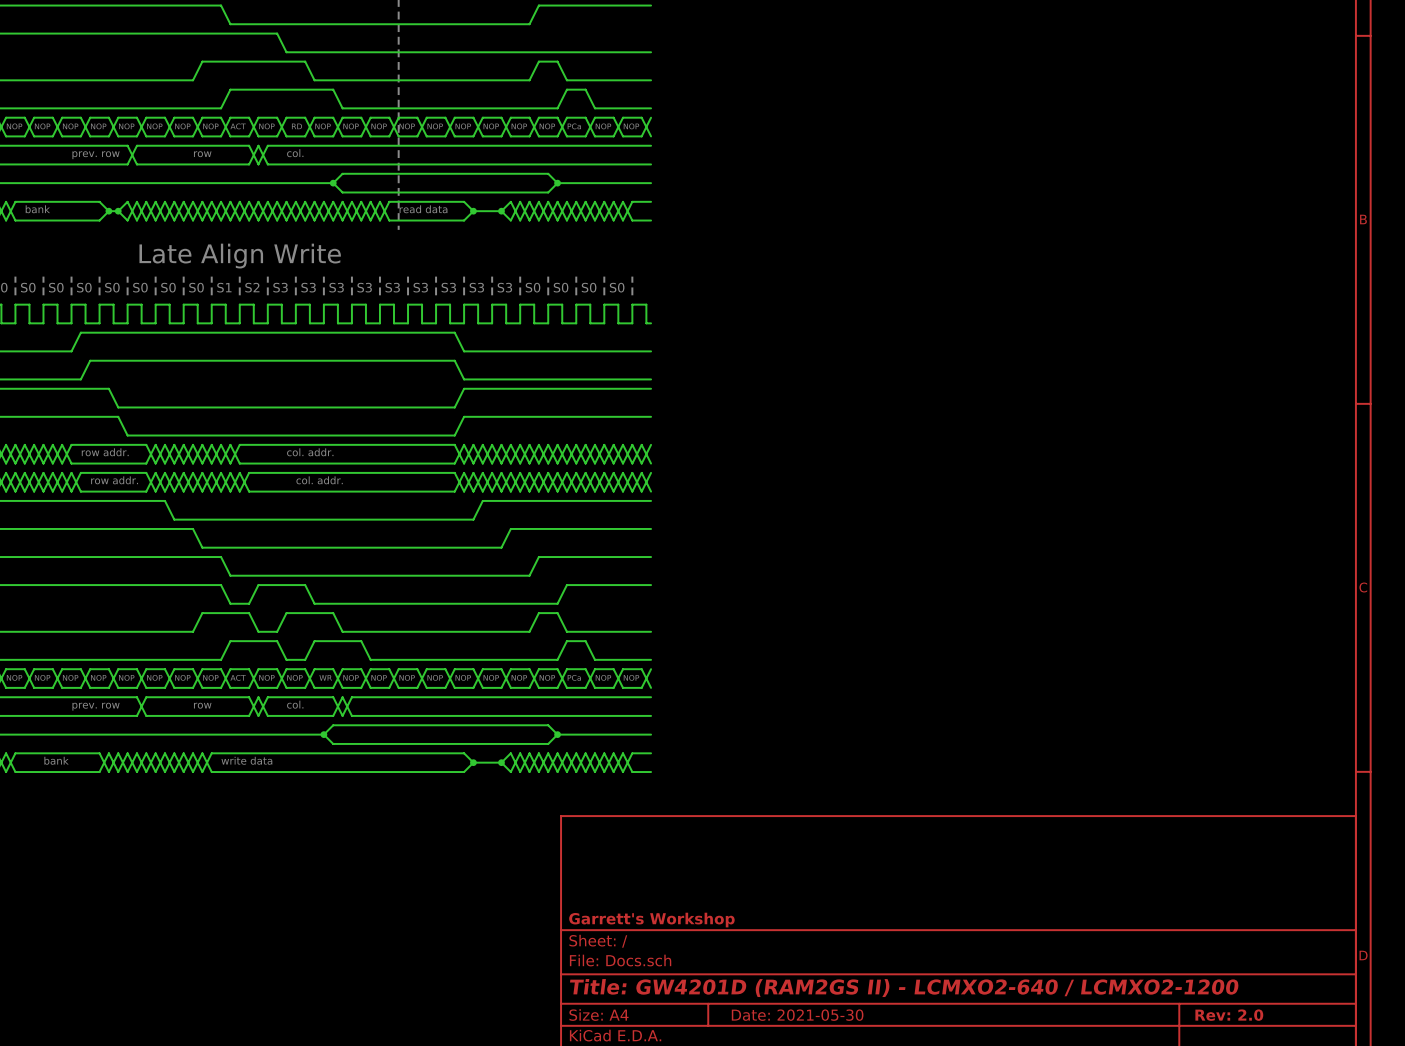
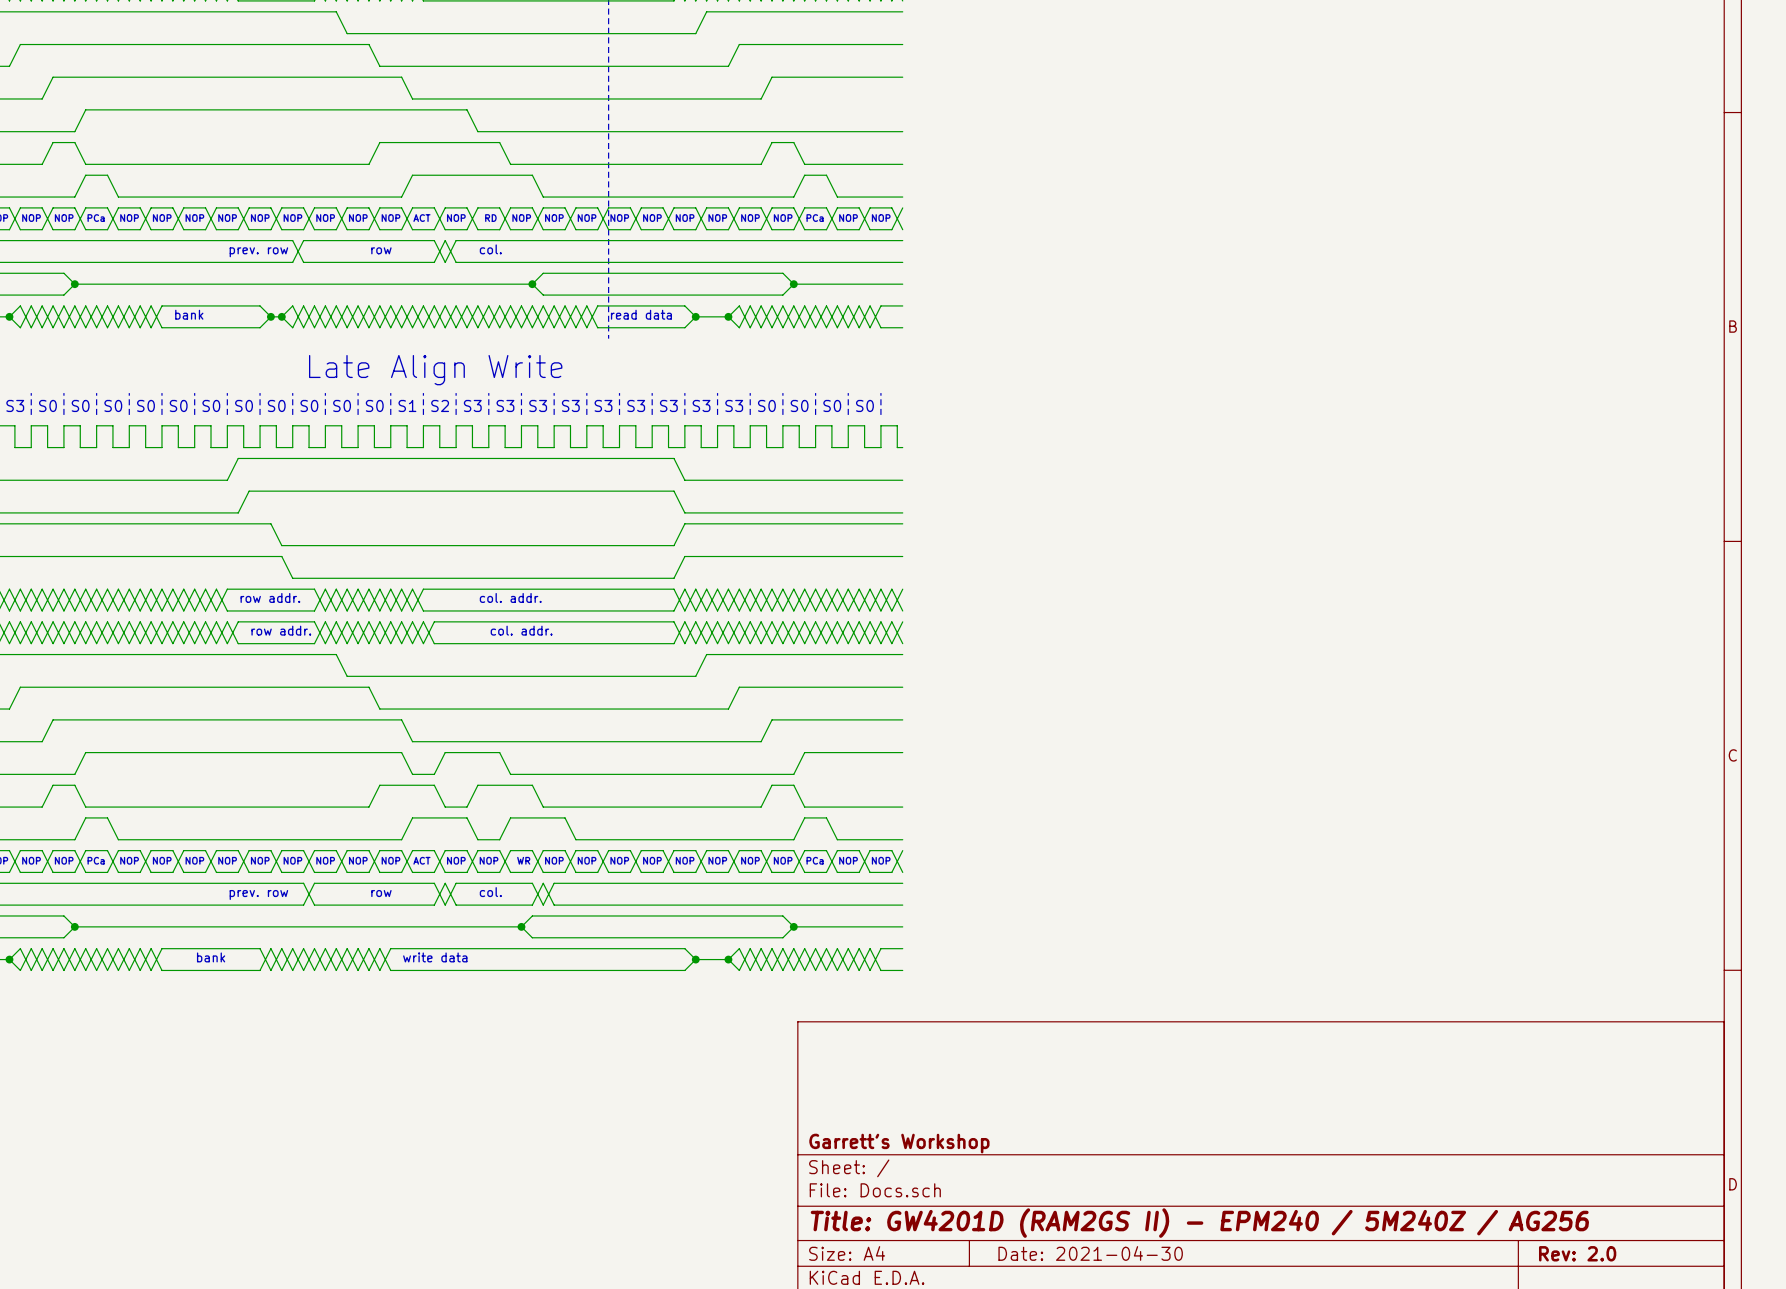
title block: Title: GW4201D (RAM2GS II) - LCMXO2-640 / LCMXO2-1200 (904, 988) -> Title: GW4201D (RAM2GS II) - EPM240 / 5M240Z / AG256 (1199, 1223)
title block: Date: 2021-05-30 (797, 1015) -> Date: 2021-04-30 (1090, 1253)

